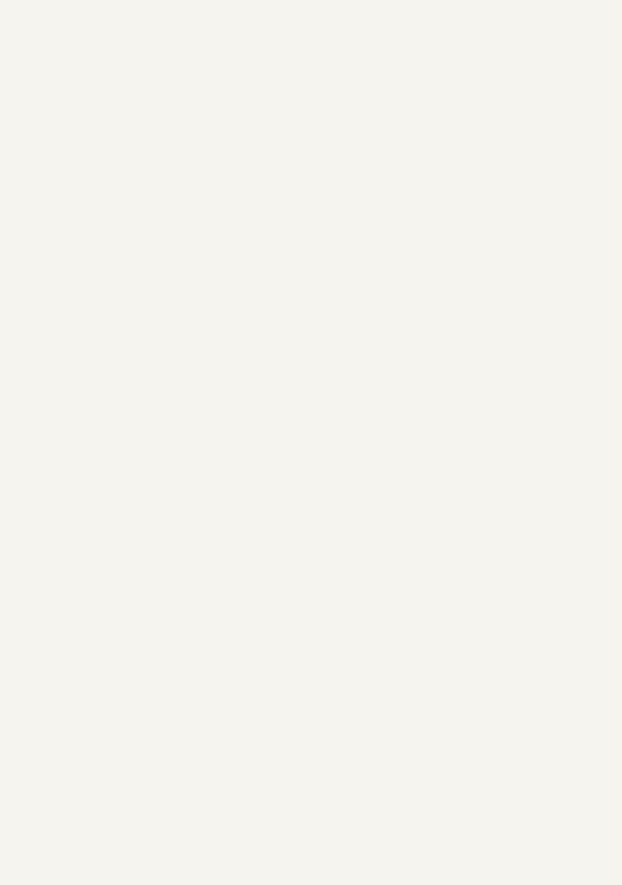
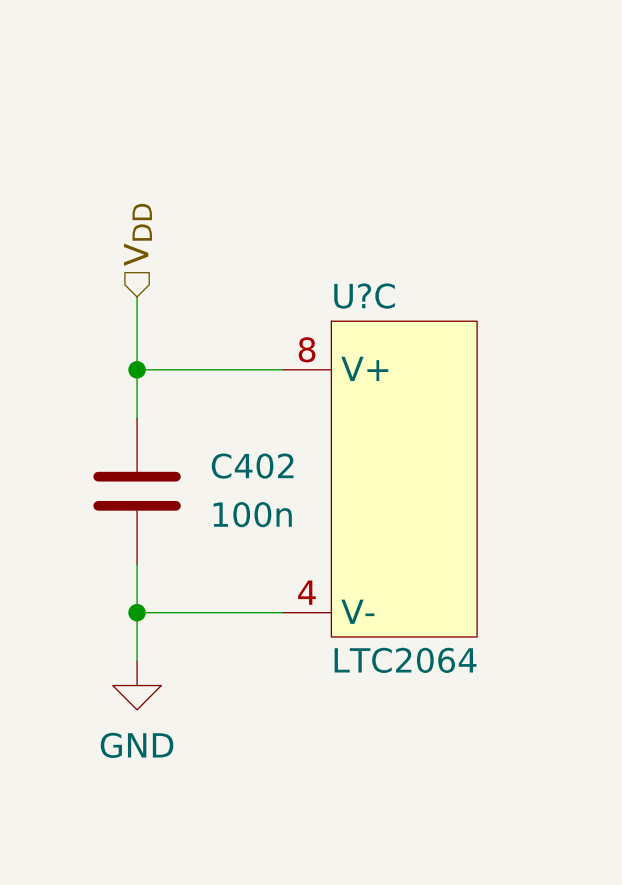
hierarchical label: none -> VDD (137, 234)
wire: none -> (137, 296) (137, 418)
wire: none -> (137, 369) (282, 369)
junction: none -> (137, 369)
U?C: none -> LTC2064 (379, 479)
C402: none -> 100n (137, 491)
wire: none -> (137, 564) (137, 661)
wire: none -> (137, 612) (282, 612)
junction: none -> (137, 612)
power symbol: none -> GND (137, 685)

